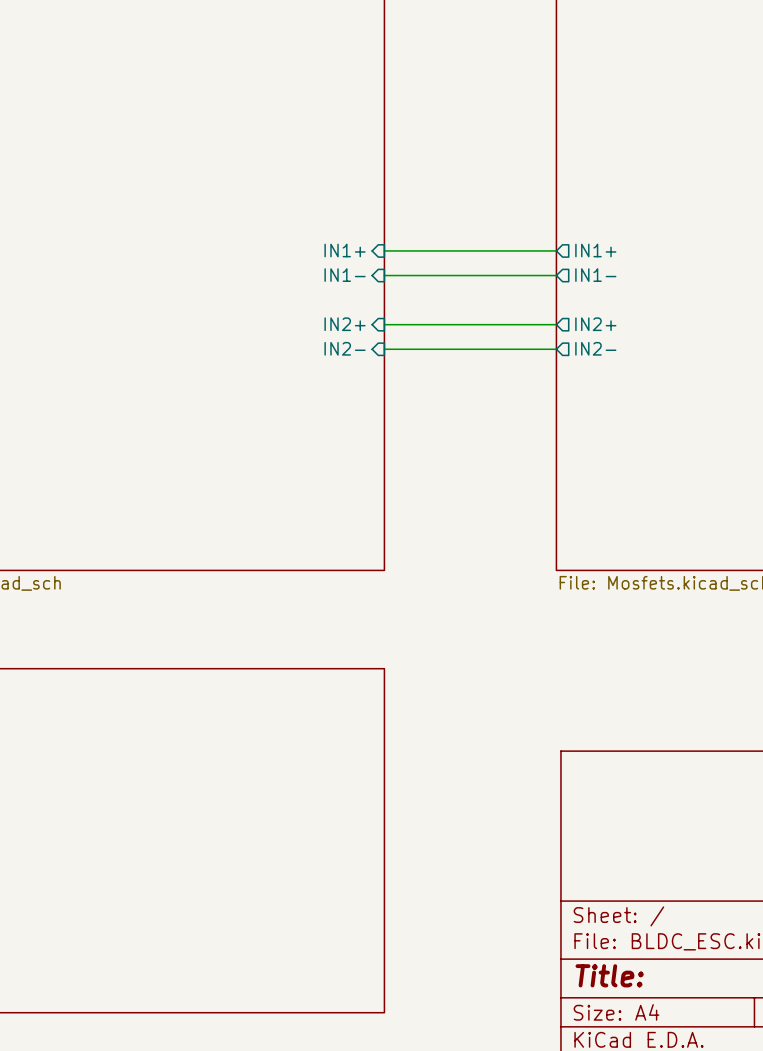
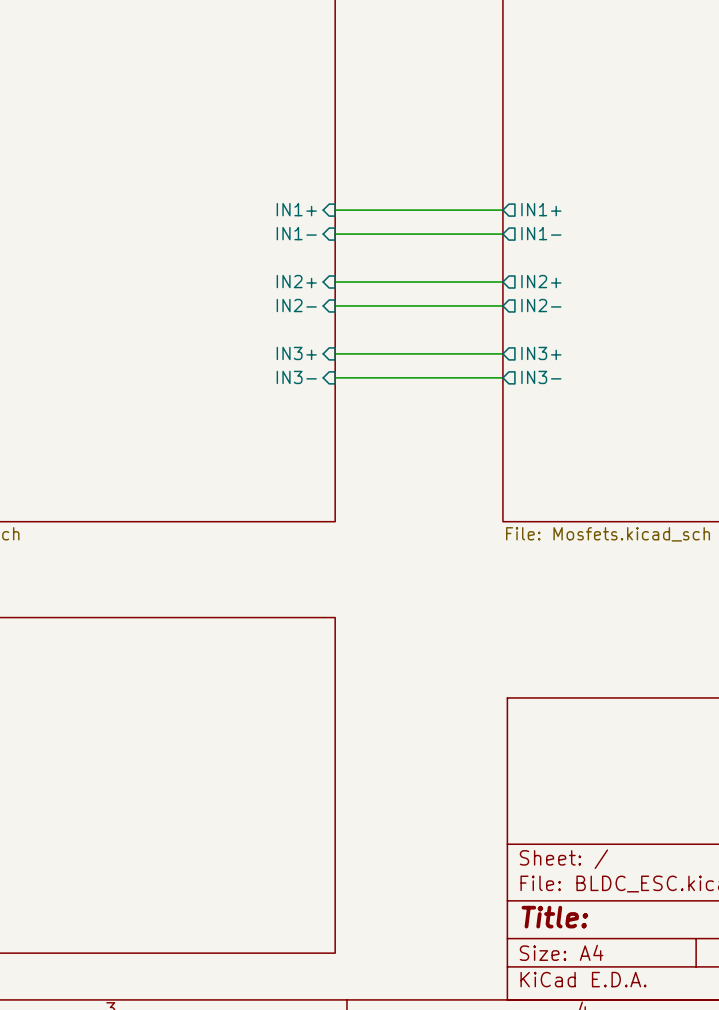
sheet pin: none -> IN3+ (296, 353)
sheet pin: none -> IN3+ (541, 353)
wire: none -> (335, 353) (502, 353)
sheet pin: none -> IN3- (296, 377)
wire: none -> (335, 377) (502, 377)
sheet pin: none -> IN3- (541, 377)

